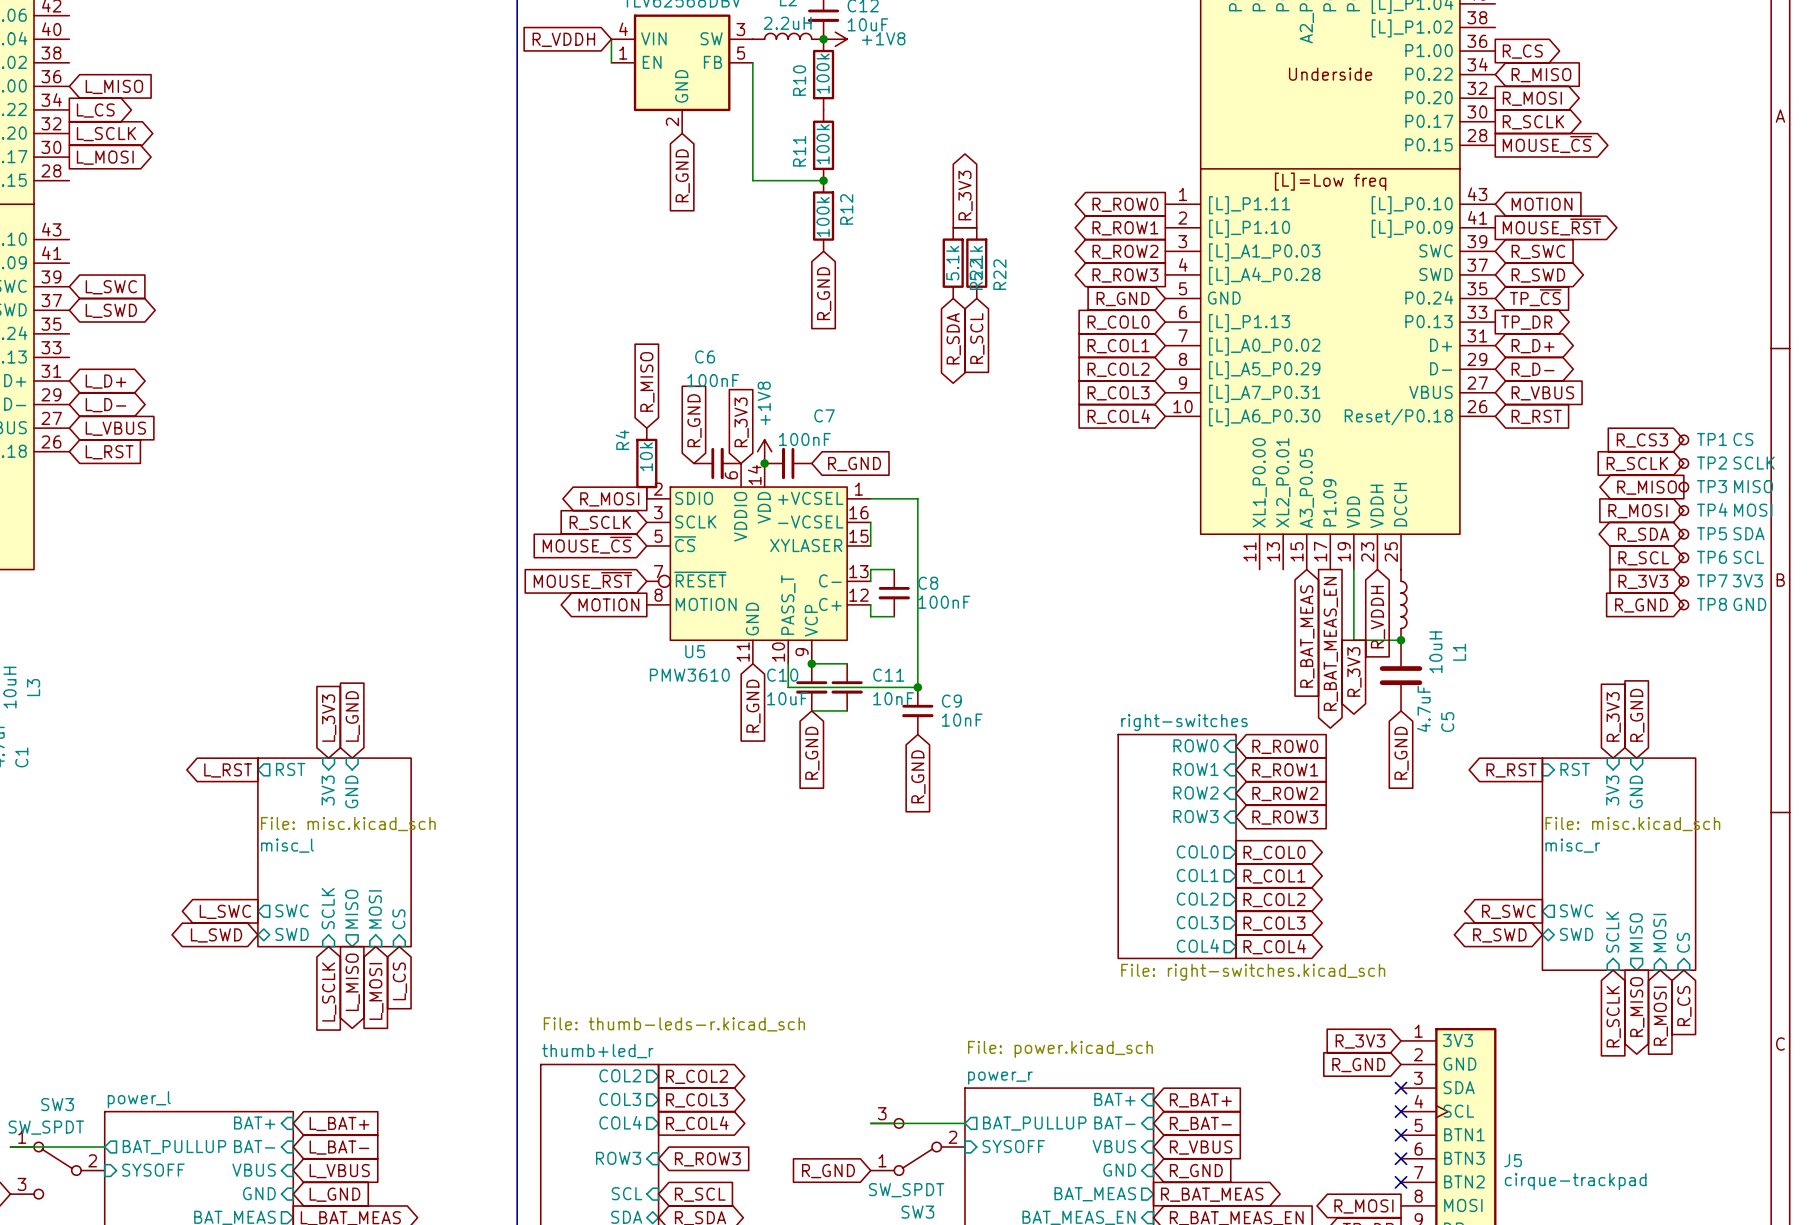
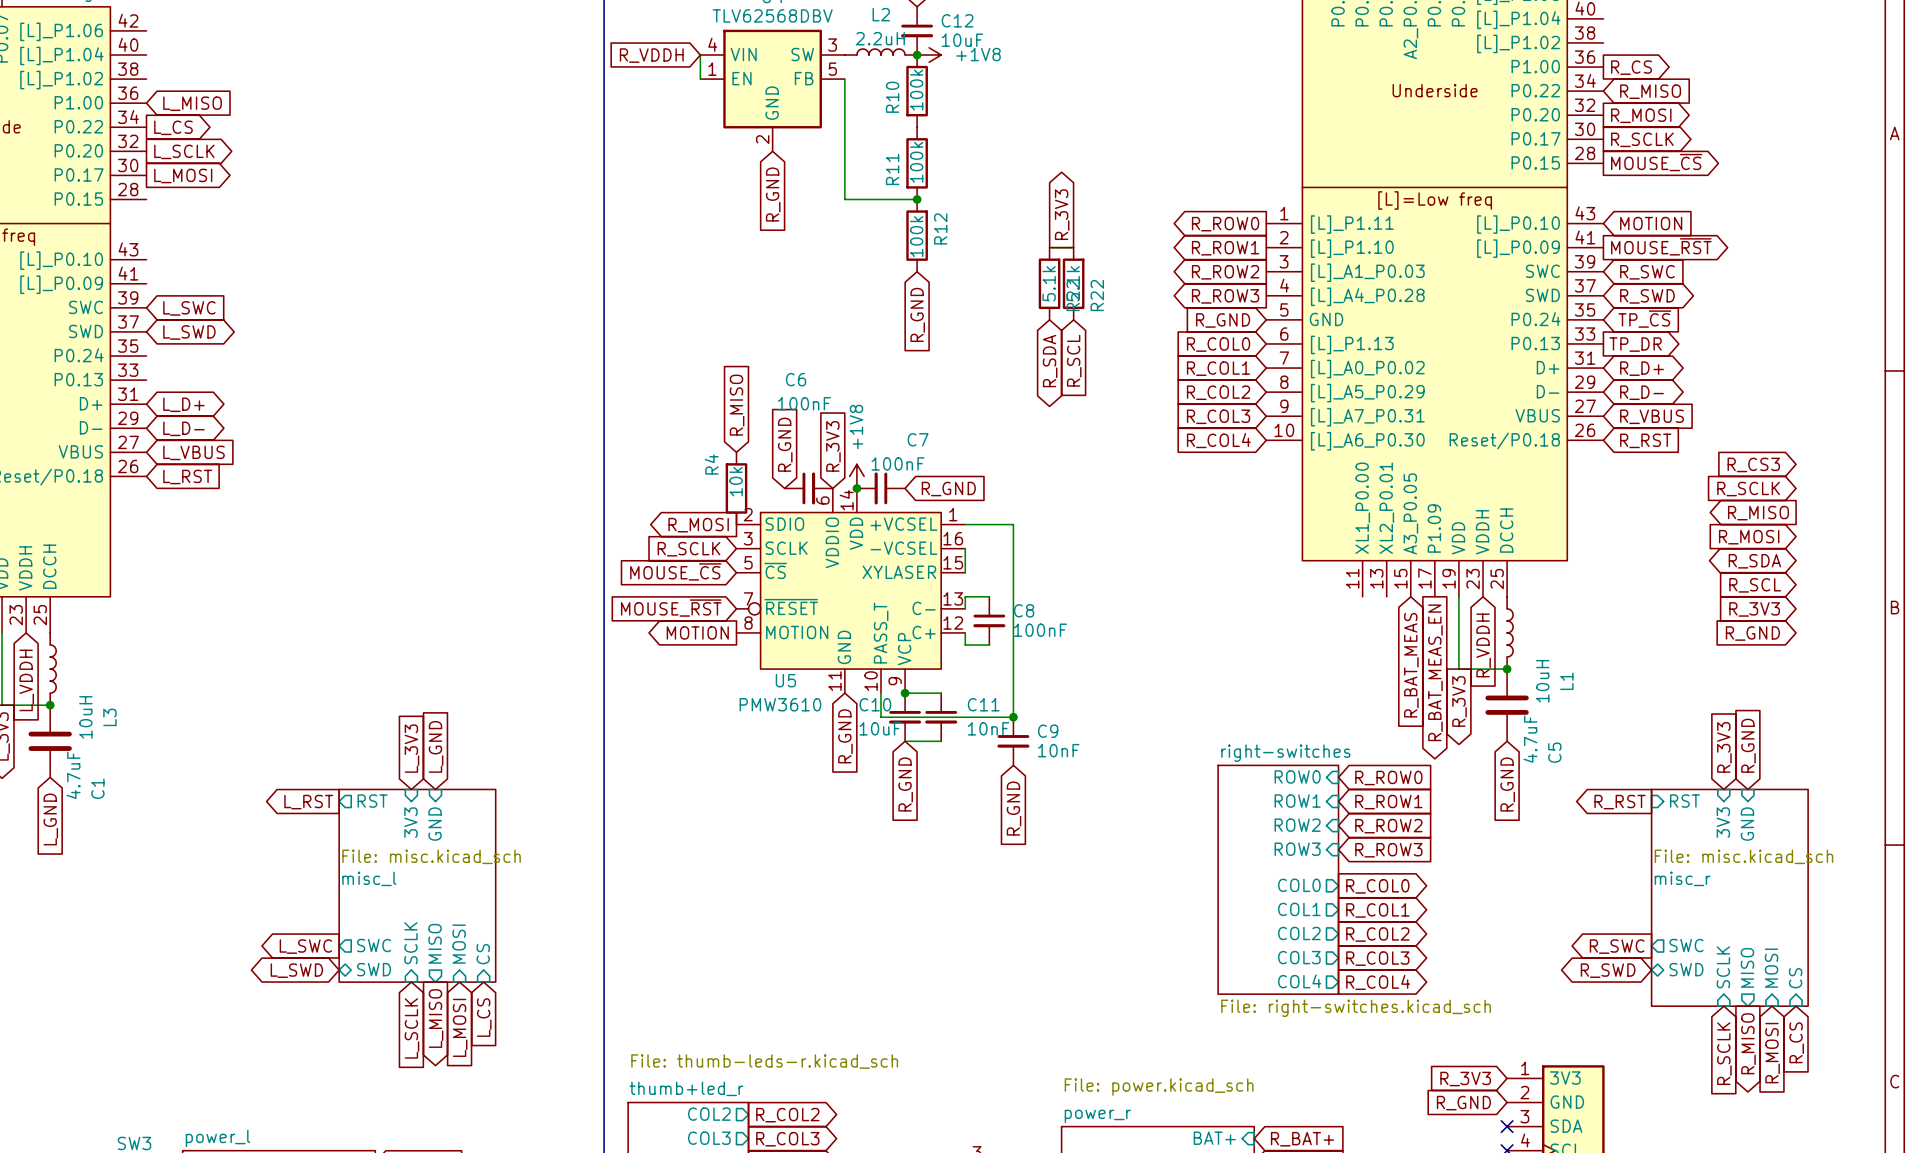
TP1: CS (1683, 439) -> none
TP2: SCLK (1683, 463) -> none
TP3: MISO (1683, 487) -> none
TP4: MOSI (1683, 510) -> none
TP5: SDA (1683, 534) -> none
TP6: SCL (1683, 557) -> none
TP7: 3V3 (1683, 581) -> none
TP8: GND (1683, 604) -> none

